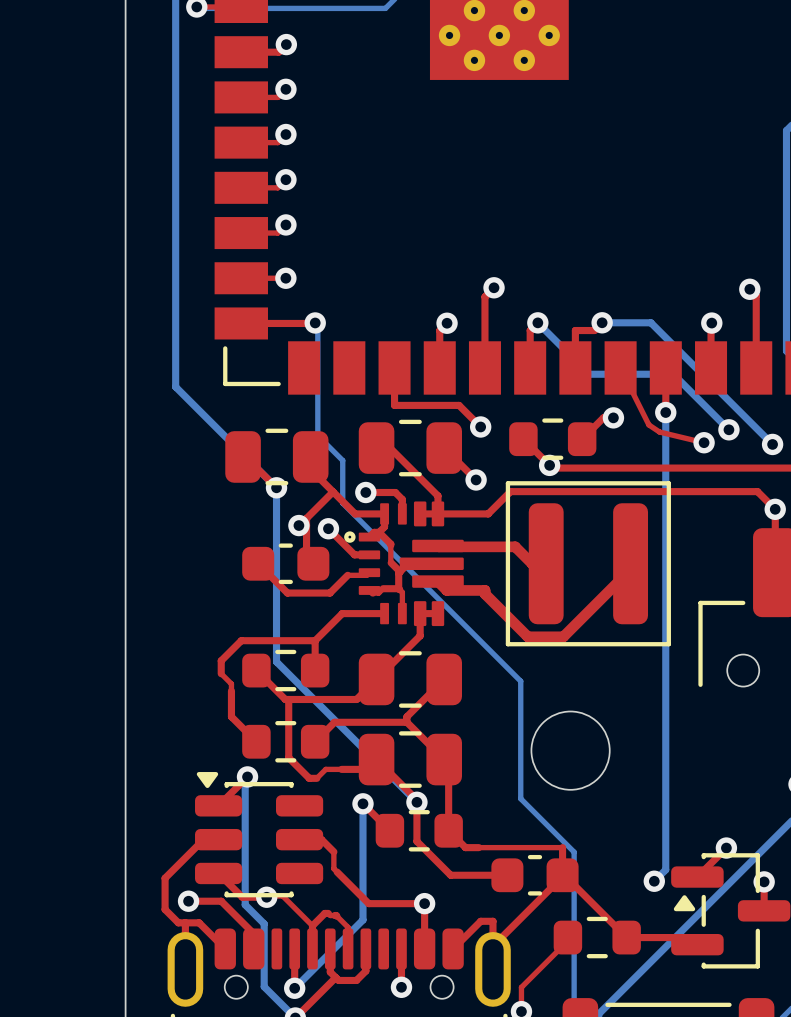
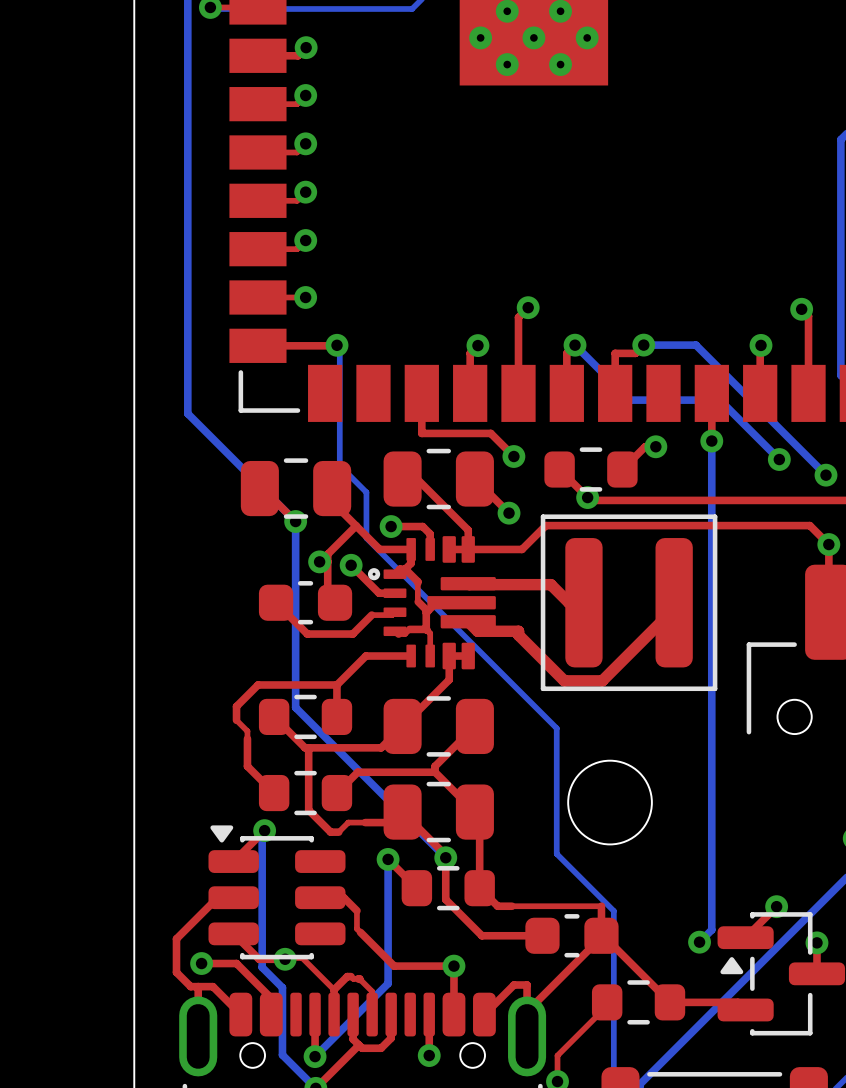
top track: (620, 367) (648, 424) (659, 432) (704, 442) -> none
via: (704, 442) -> none

